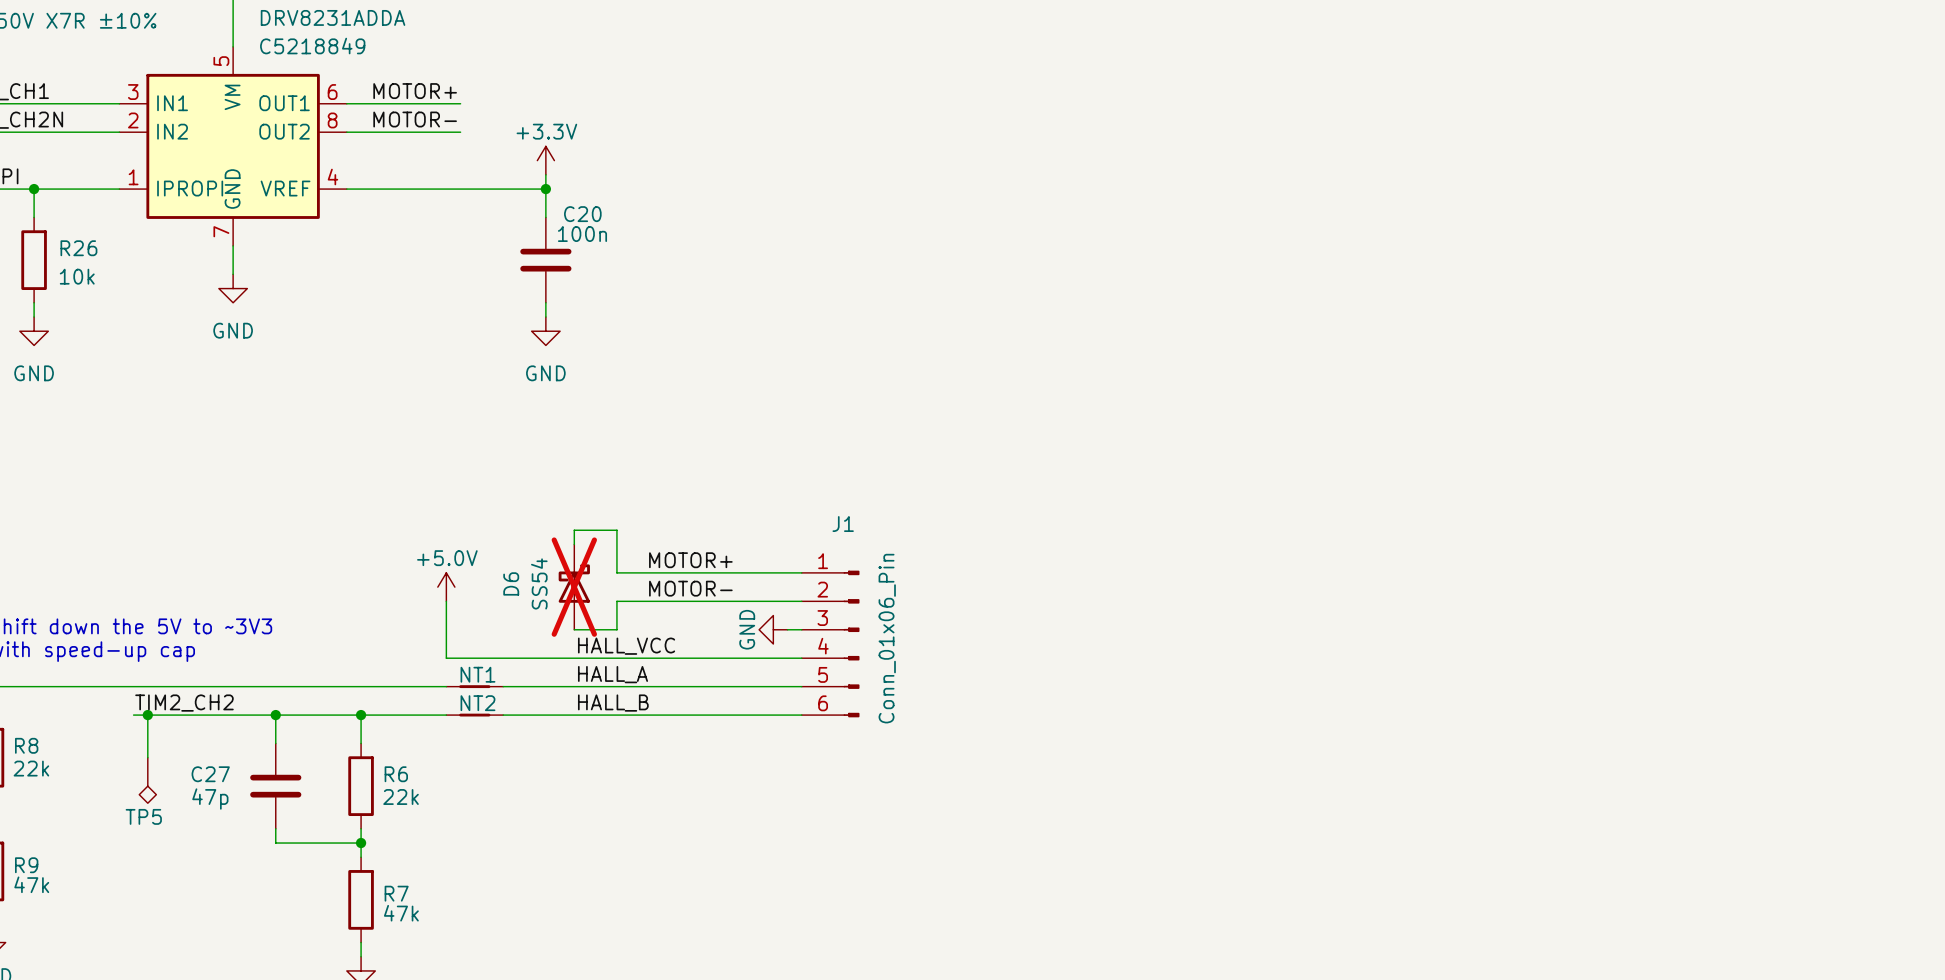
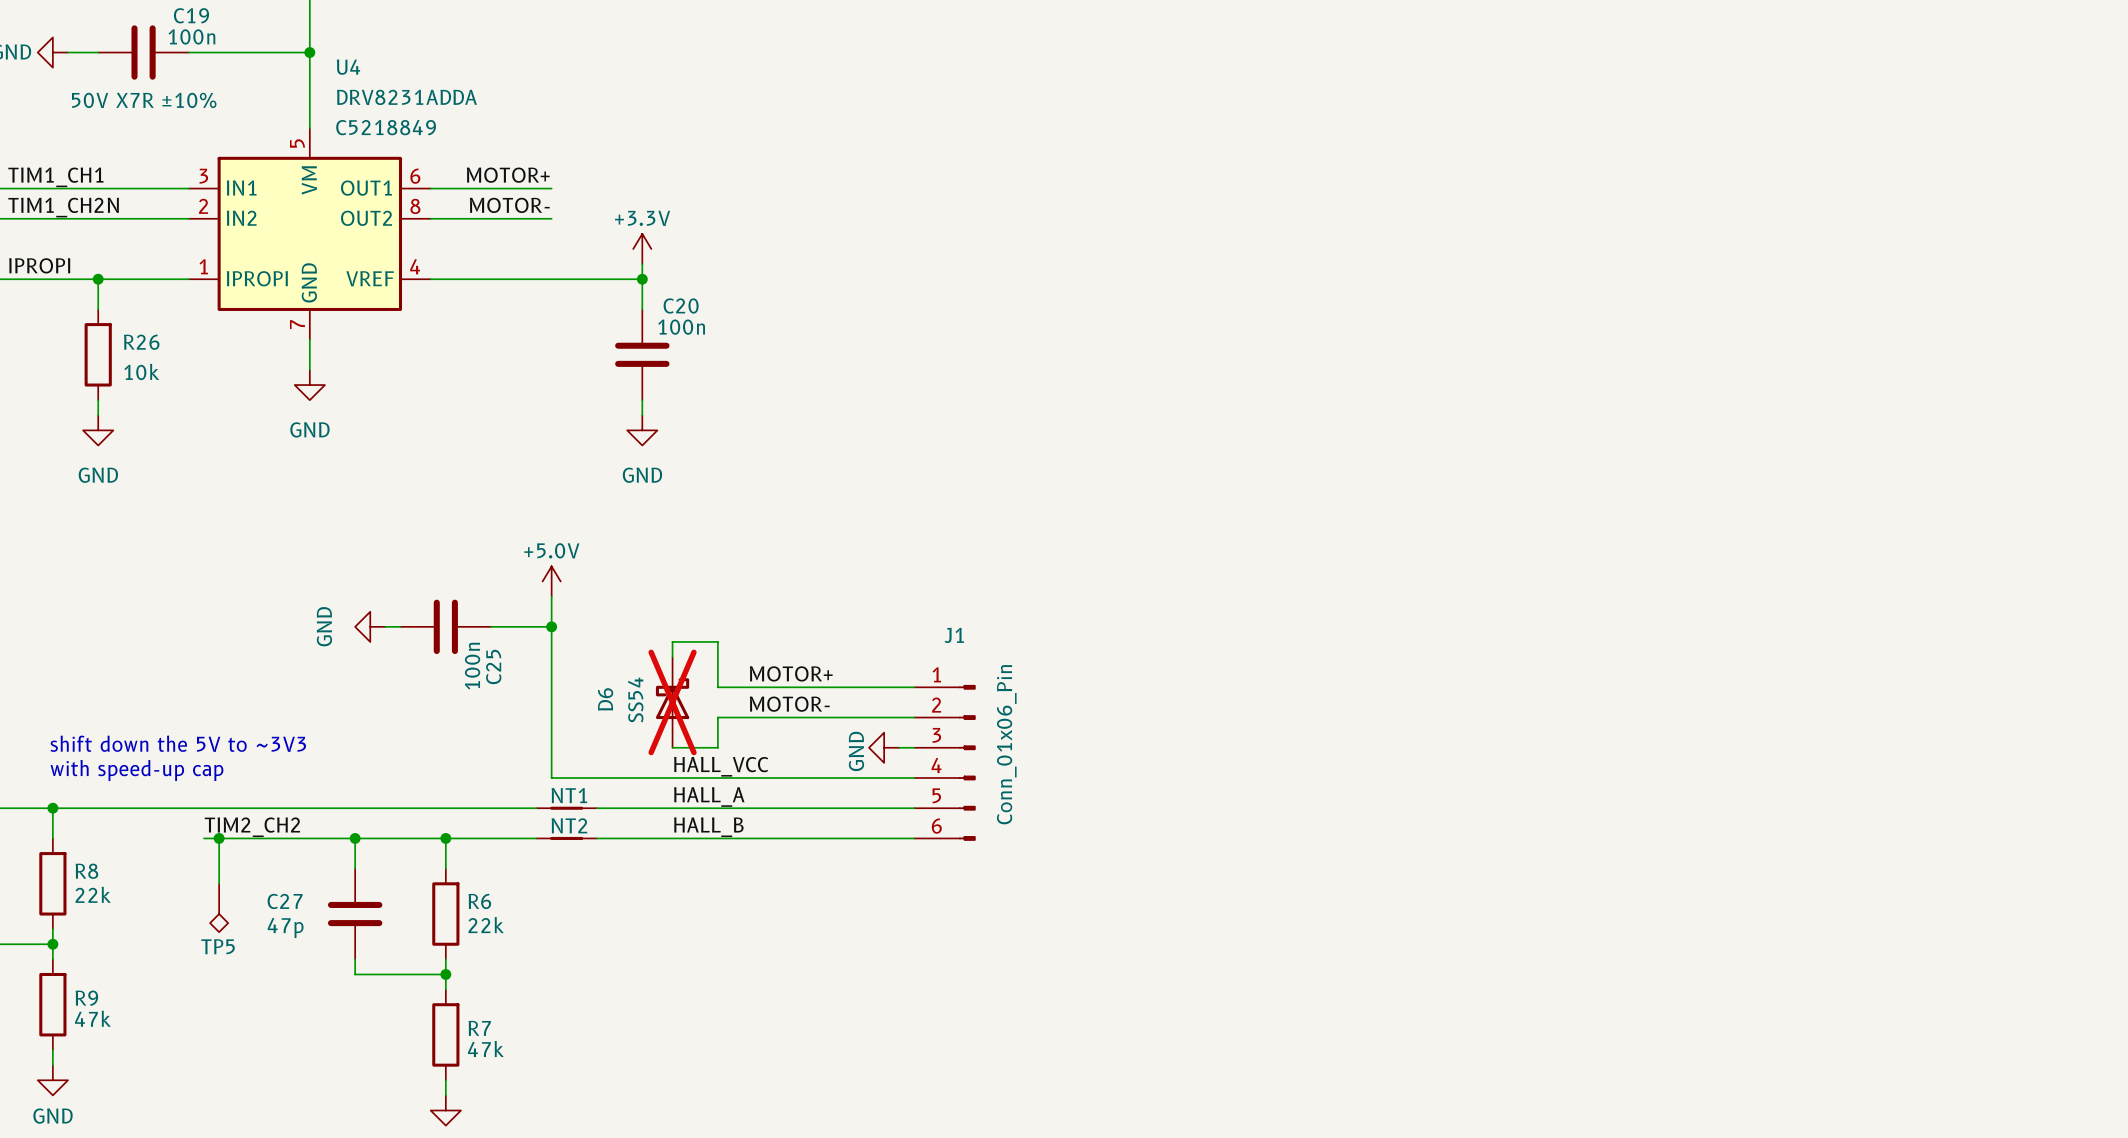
power symbol: none -> GND (370, 626)
wire: none -> (385, 626) (400, 626)
C25: none -> 100n (445, 626)
wire: none -> (491, 626) (551, 626)
junction: none -> (551, 626)
power symbol position: +5.0V (446, 587) -> +5.0V (551, 581)
wire: (446, 601) (446, 658) (460, 658) -> (551, 596) (551, 778)

